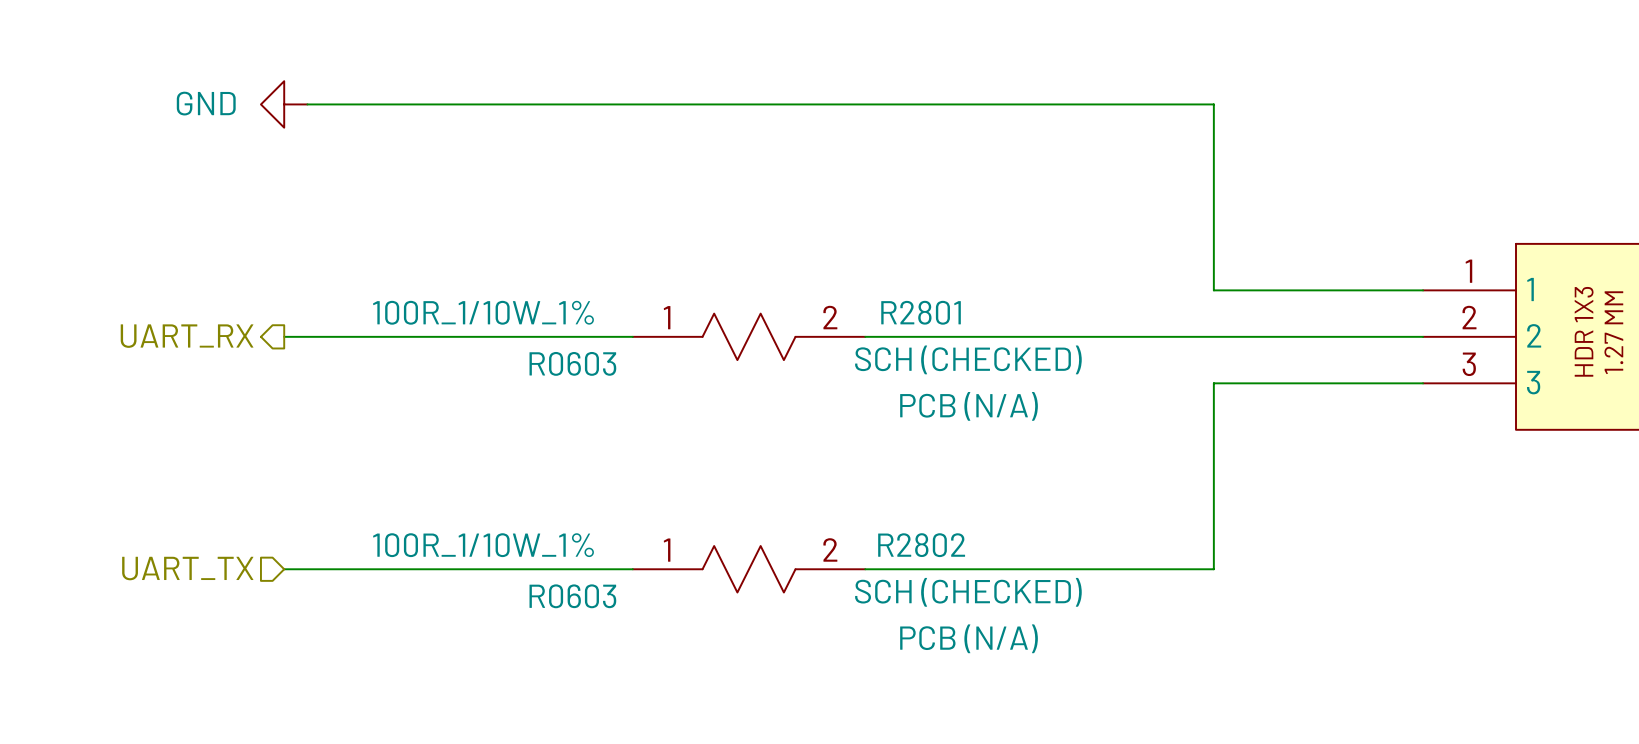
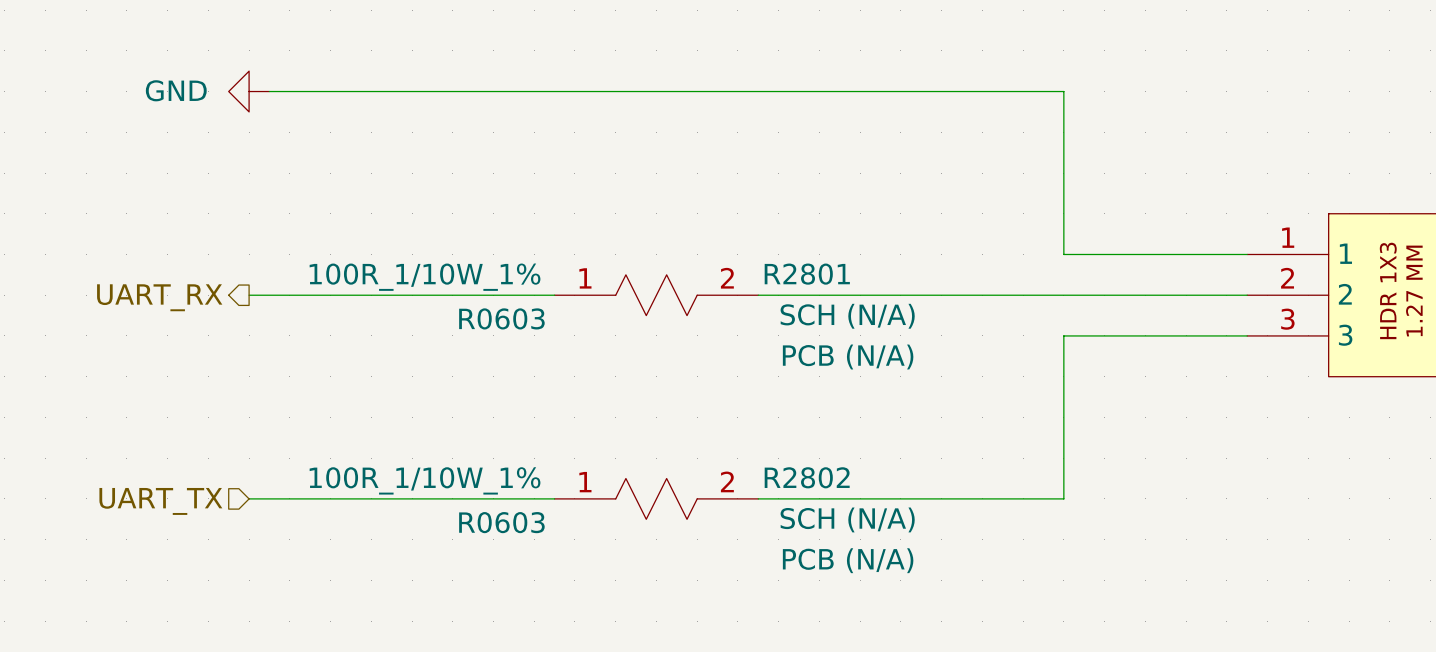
R2801 text: SCH (CHECKED) (968, 359) -> SCH (N/A) (847, 316)
R2802 text: SCH (CHECKED) (968, 592) -> SCH (N/A) (847, 519)

